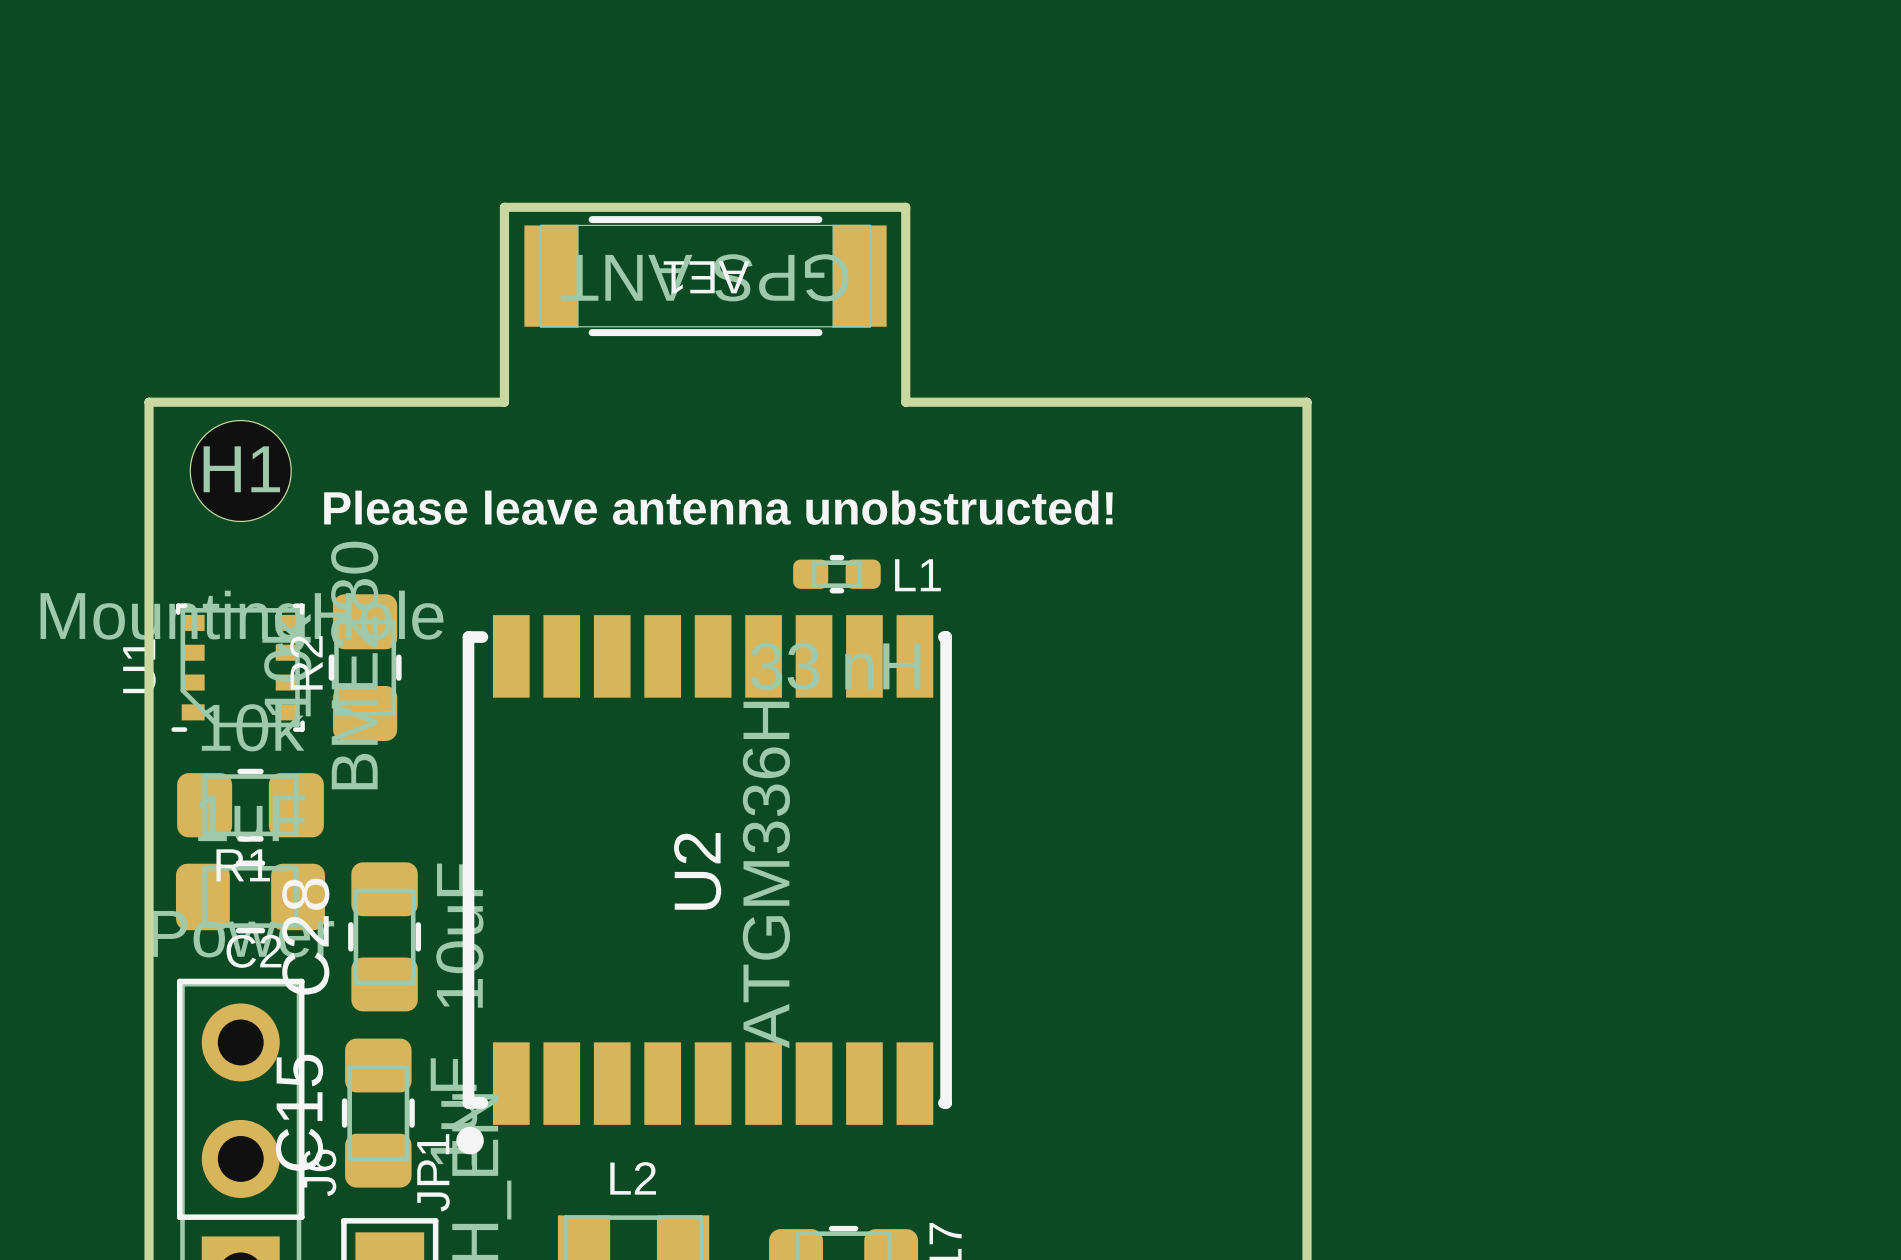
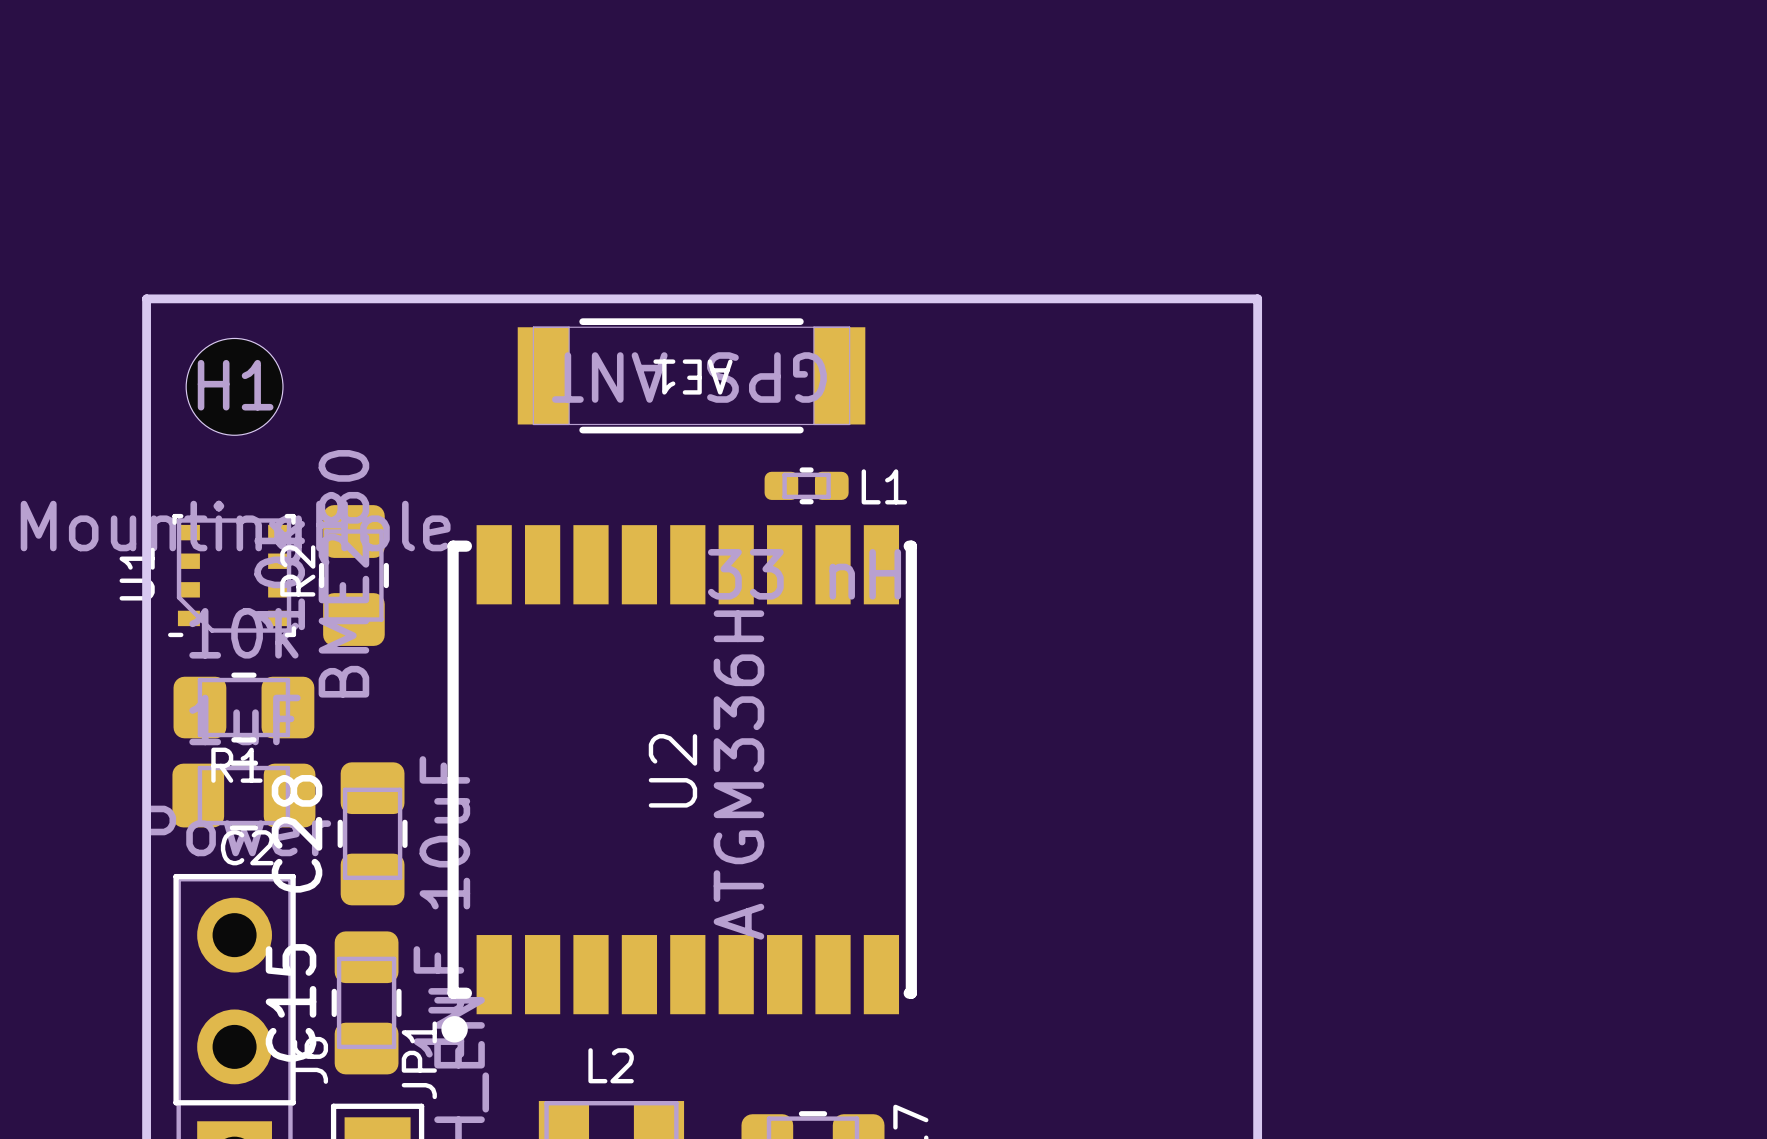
AE1 position: (705, 276) -> (691, 375)
board edge: (149, 402) (504, 402) (504, 207) (905, 207) (905, 402) (1307, 402) -> (146, 320) (146, 298) (1257, 298) (1257, 320)
text: Please leave antenna unobstructed! (718, 507) -> none

